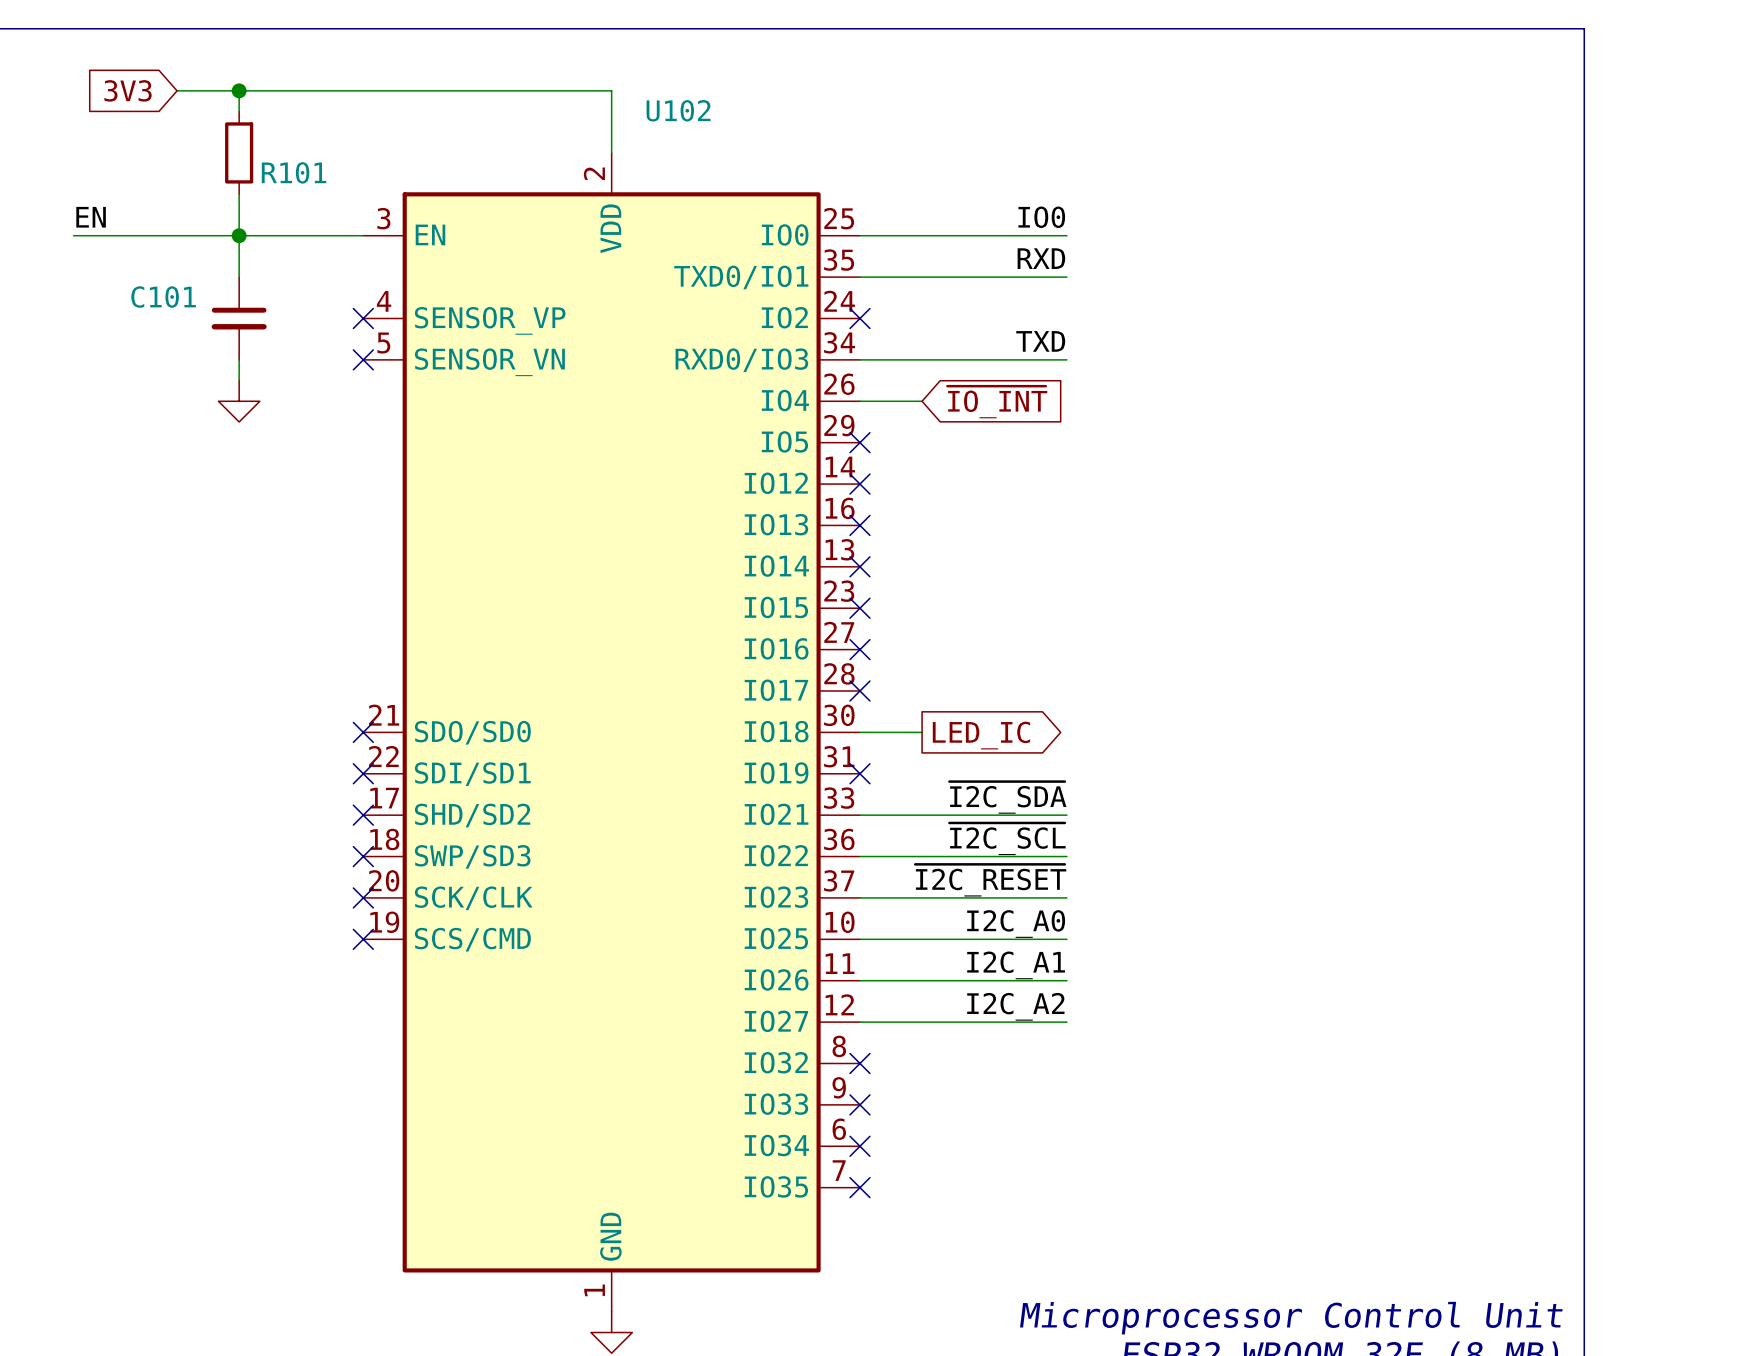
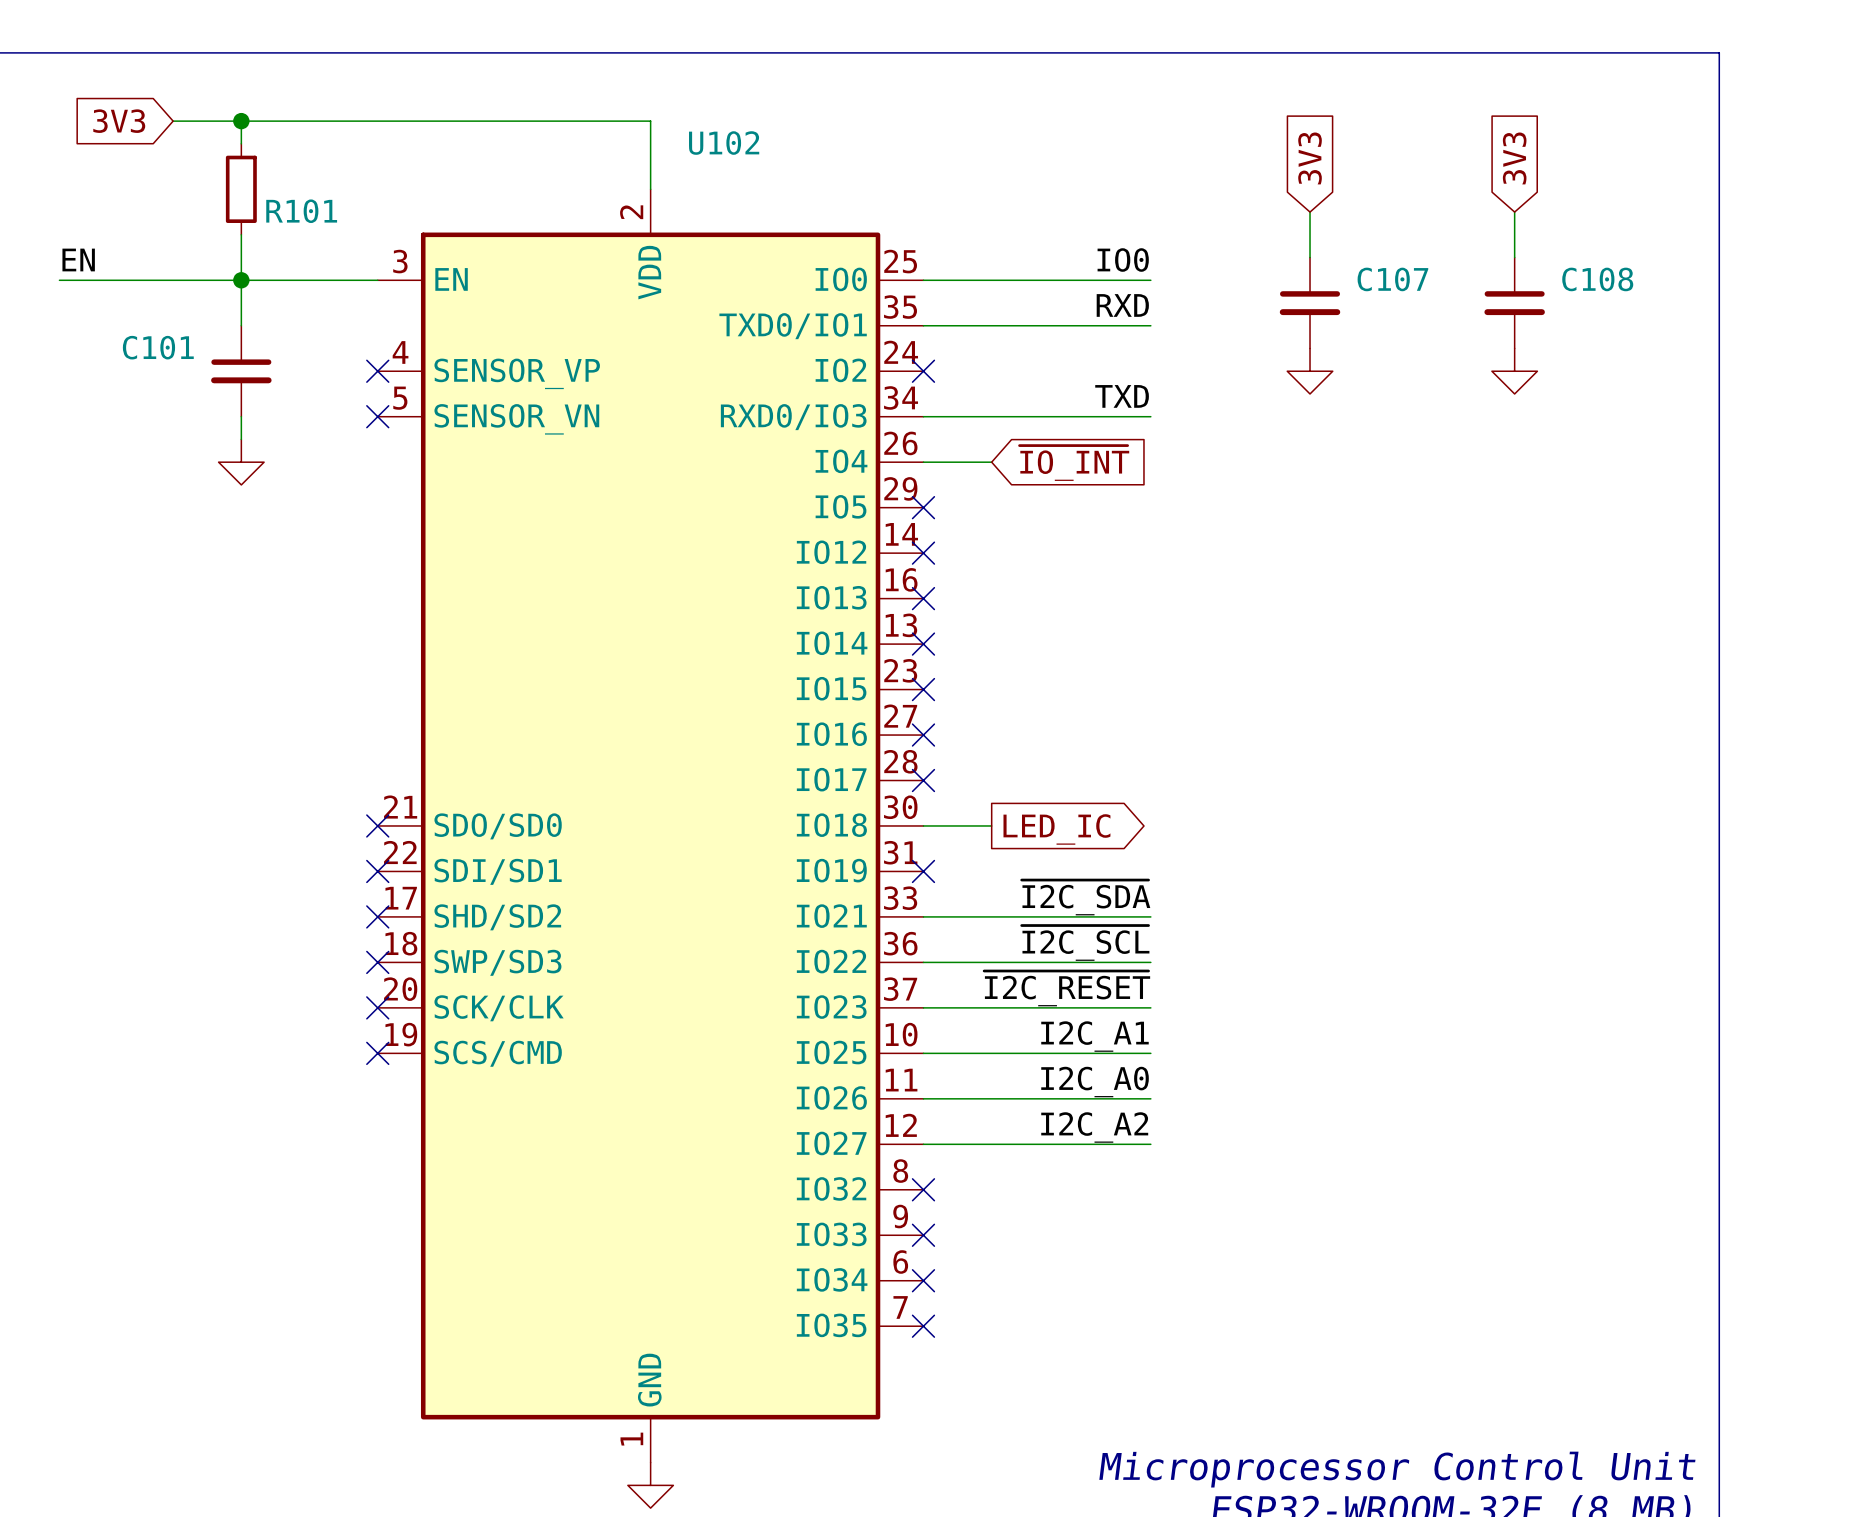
global label: none -> 3V3 (1310, 158)
global label: none -> 3V3 (1514, 158)
wire: none -> (1310, 212) (1310, 257)
wire: none -> (1514, 212) (1514, 257)
C107: none -> (1310, 303)
C108: none -> (1514, 303)
power symbol: none -> (1310, 371)
power symbol: none -> (1514, 371)
label: I2C_A0 (1016, 924) -> I2C_A1 (1094, 1036)
label: I2C_A1 (1016, 965) -> I2C_A0 (1095, 1082)

